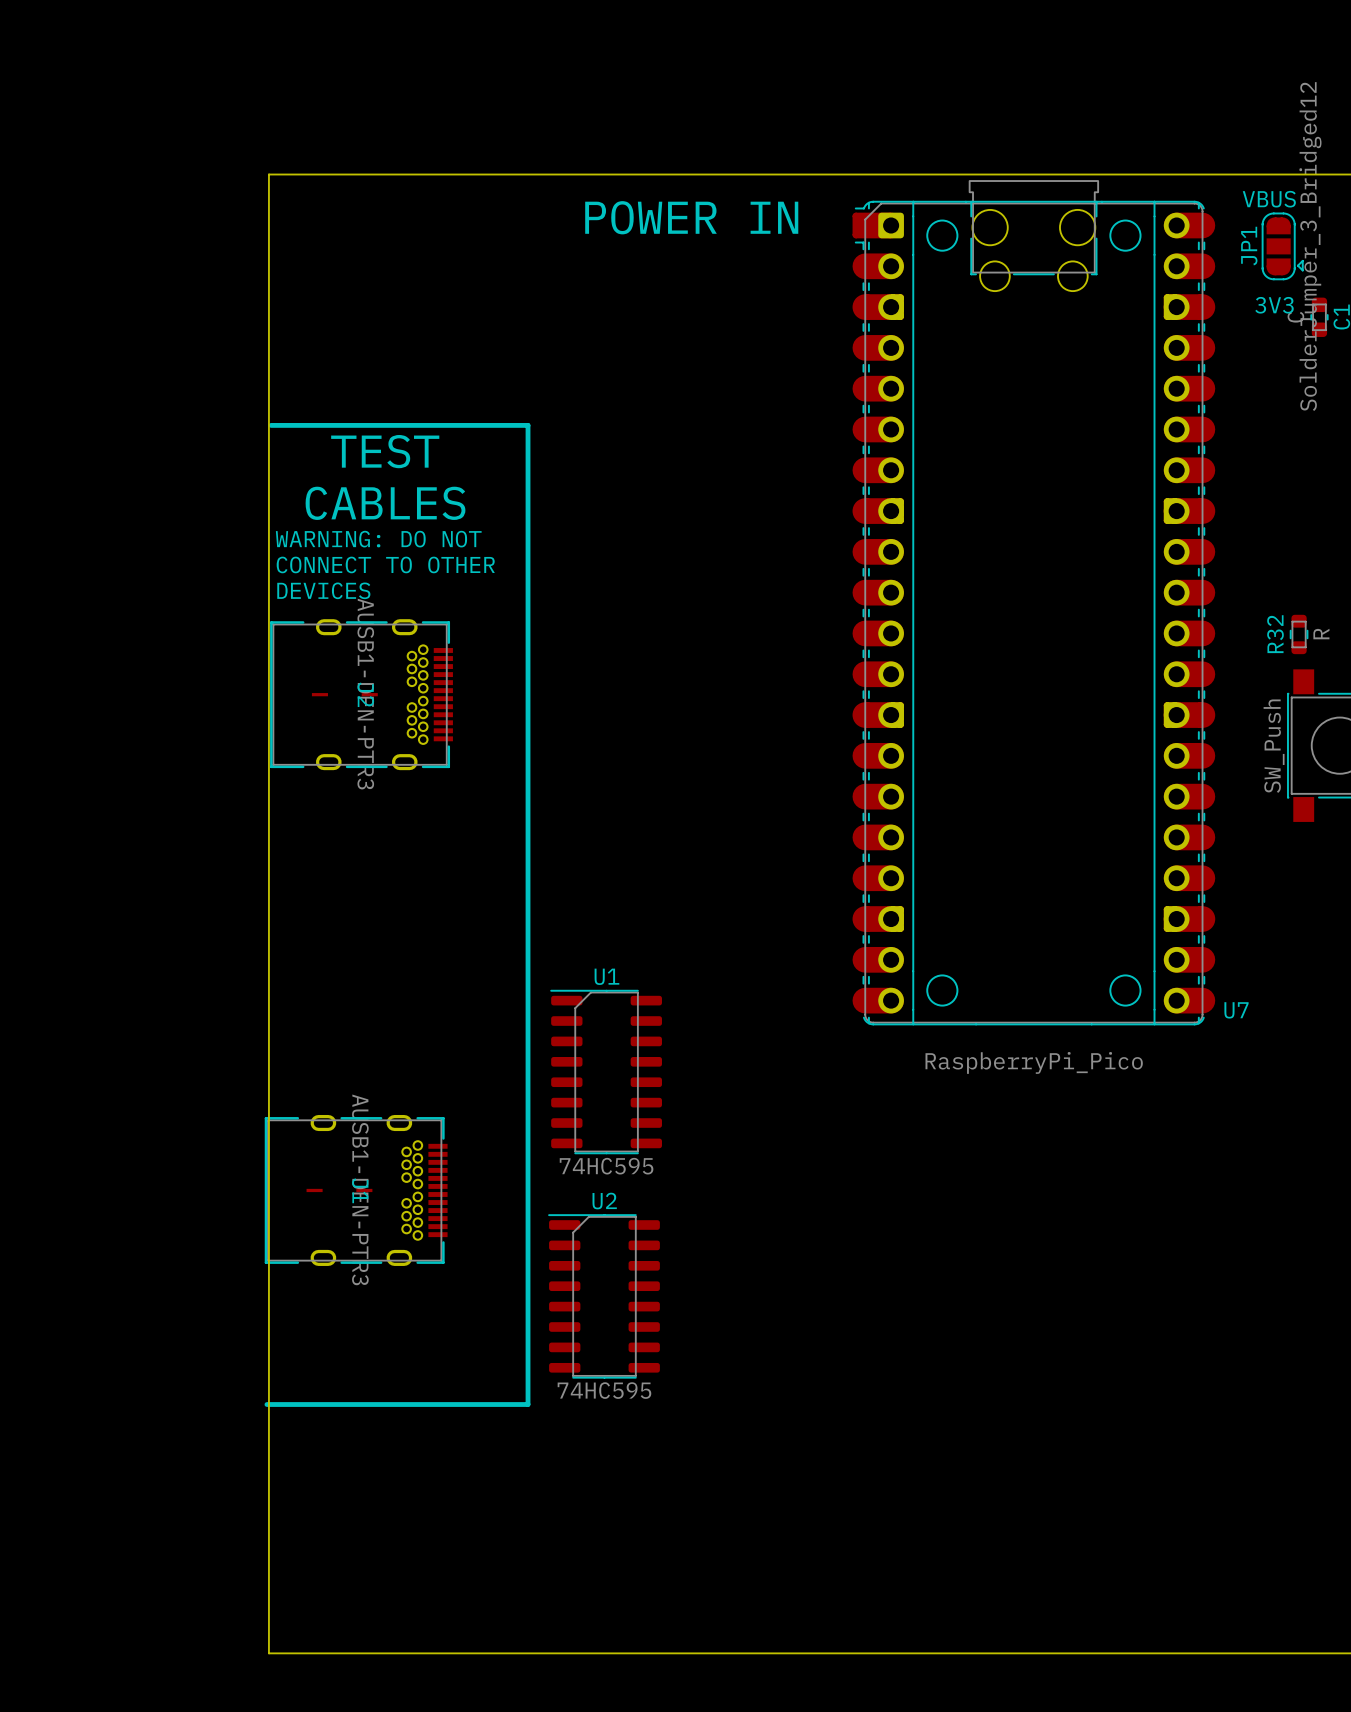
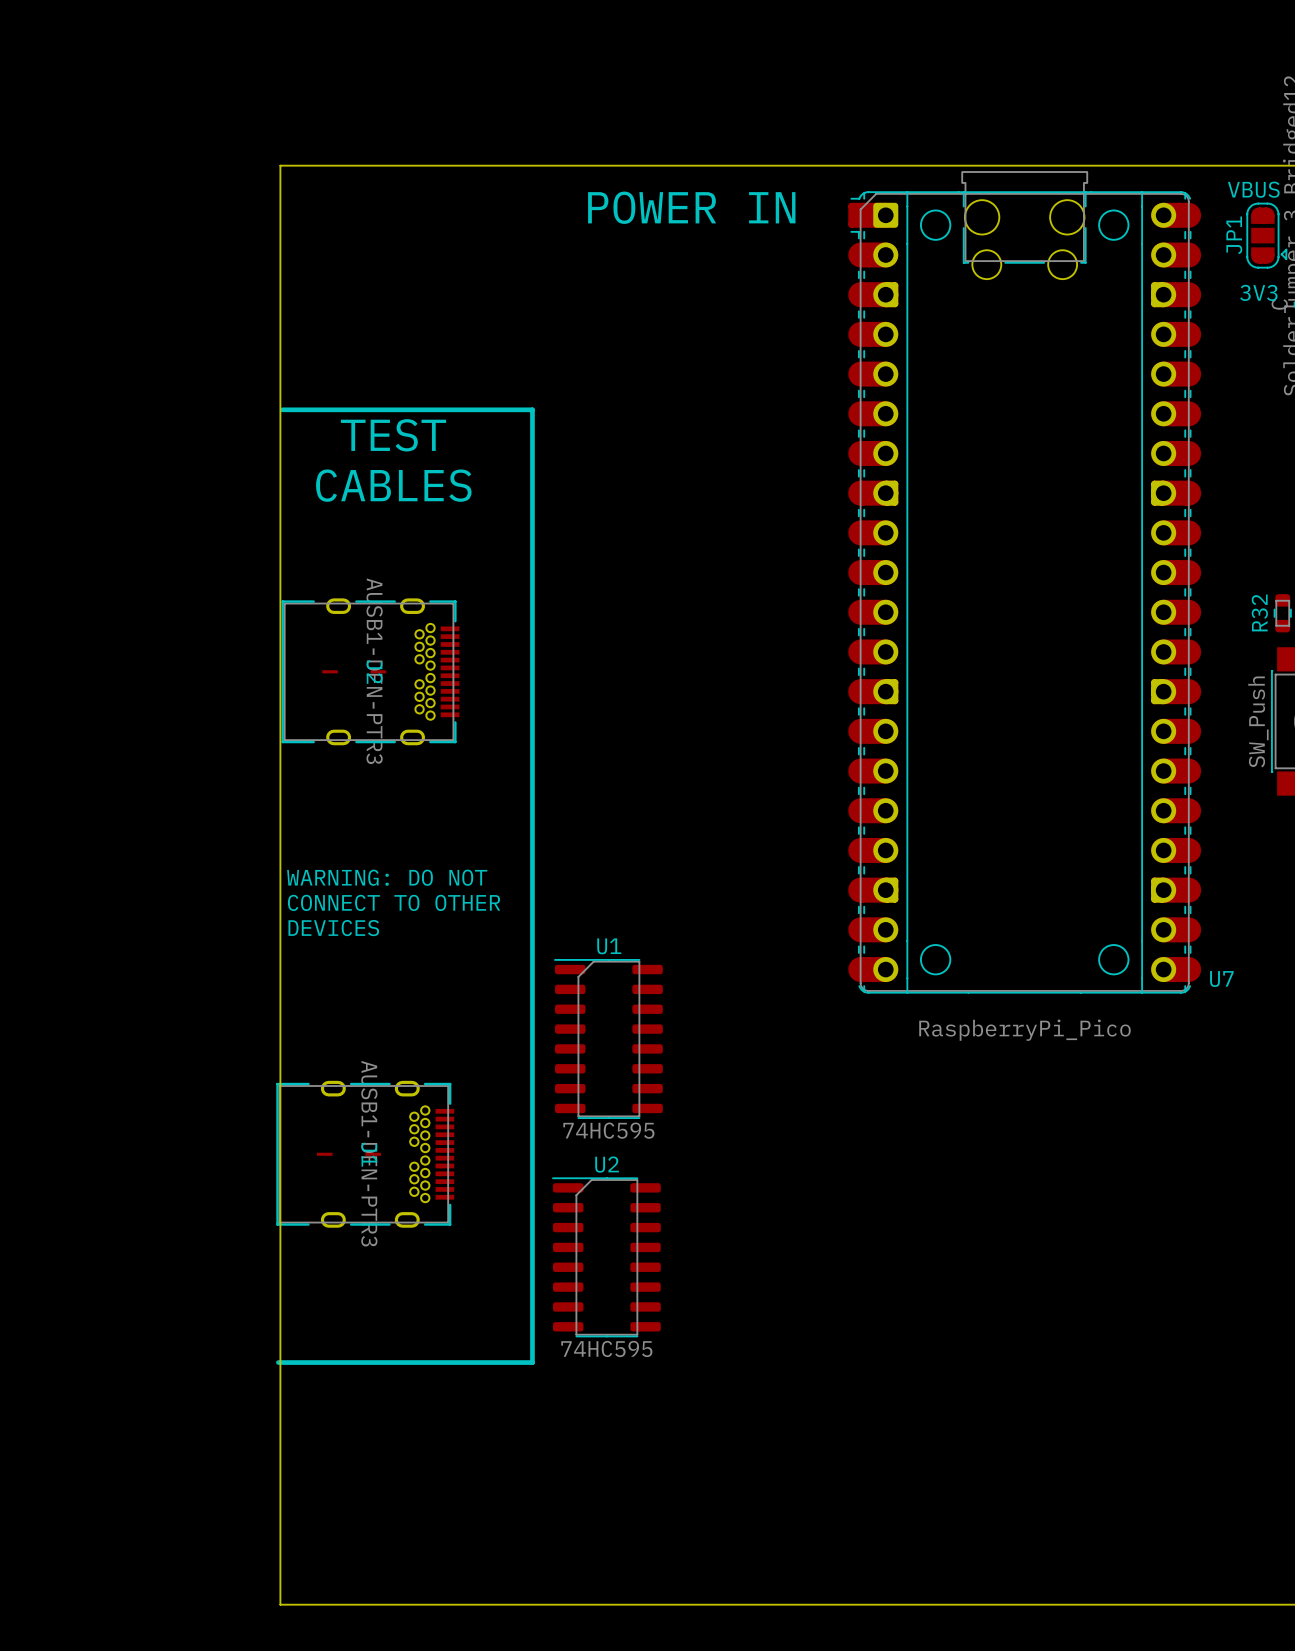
text position: WARNING: DO NOT (378, 539) -> WARNING: DO NOT (387, 877)
text position: CONNECT TO OTHER (385, 564) -> CONNECT TO OTHER (394, 902)
text position: DEVICES (323, 590) -> DEVICES (333, 928)

